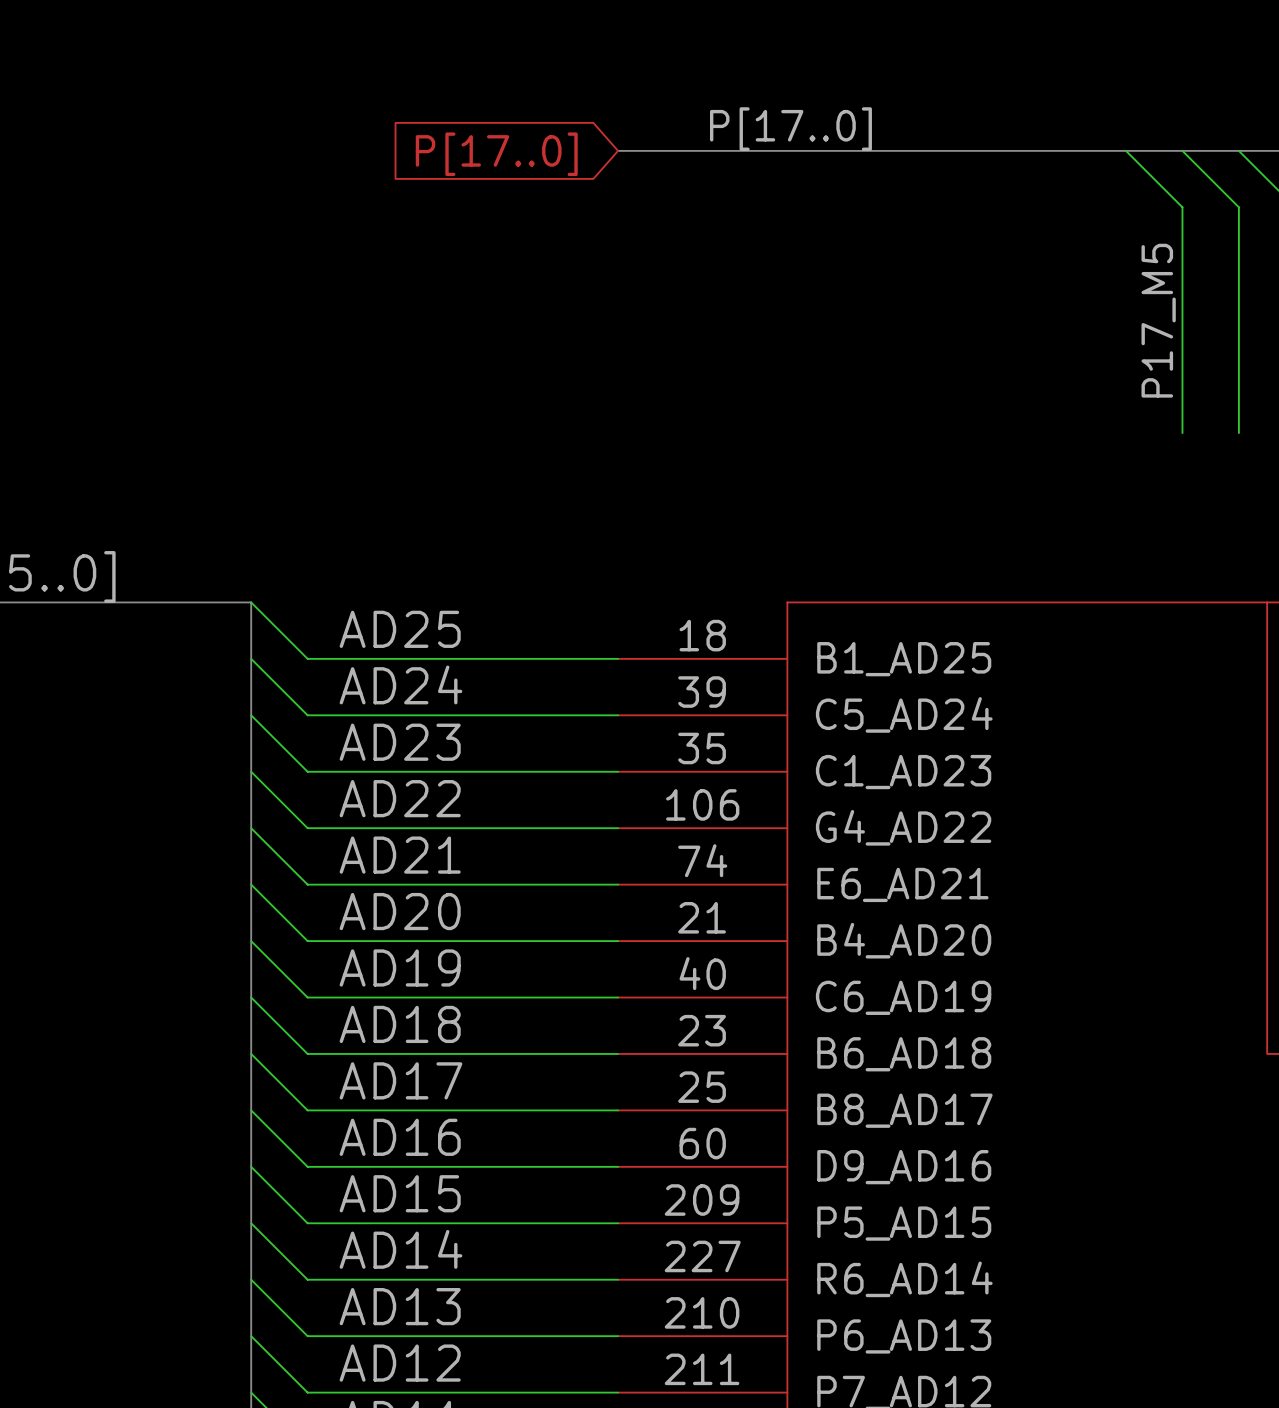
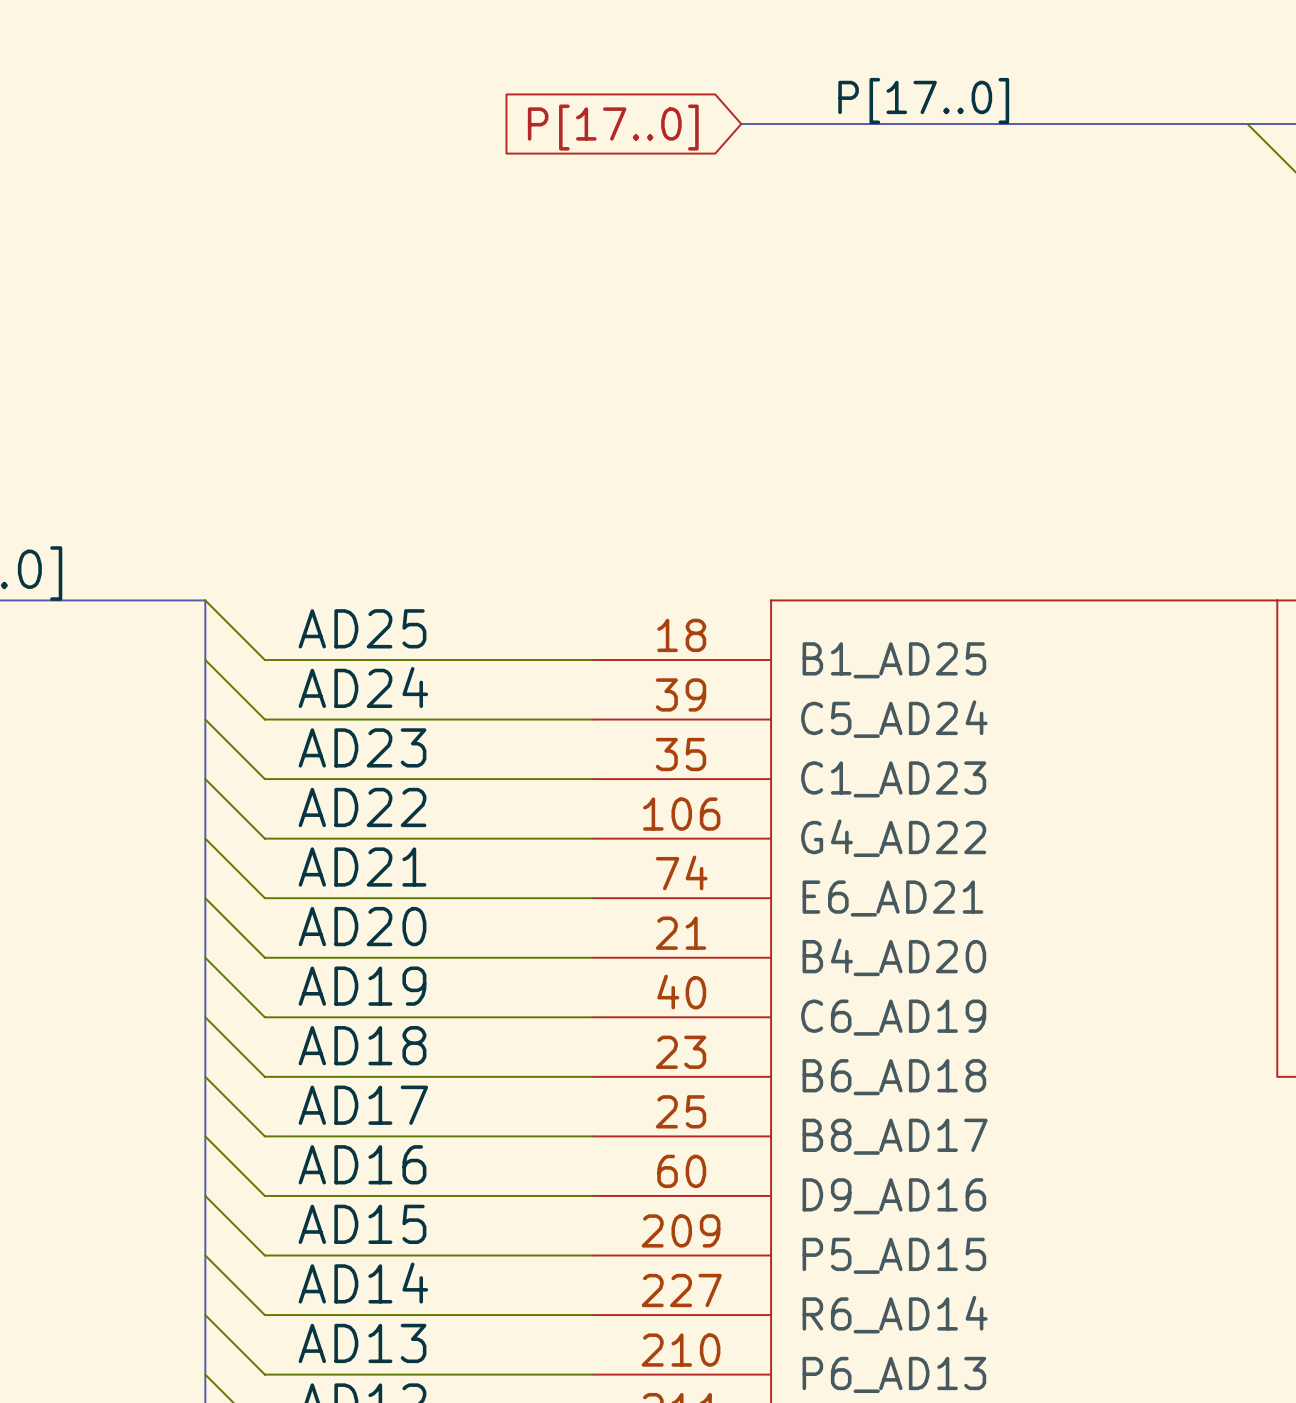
label position: P[17..0] (790, 129) -> P[17..0] (923, 100)
bus: (618, 150) (759, 150) -> none
wire: (1126, 150) (1182, 207) (1182, 433) -> none
wire: (1182, 150) (1238, 207) (1238, 433) -> none
global label position: P[17..0] (496, 154) -> P[17..0] (613, 127)
label: P17_M5 (1158, 320) -> none

